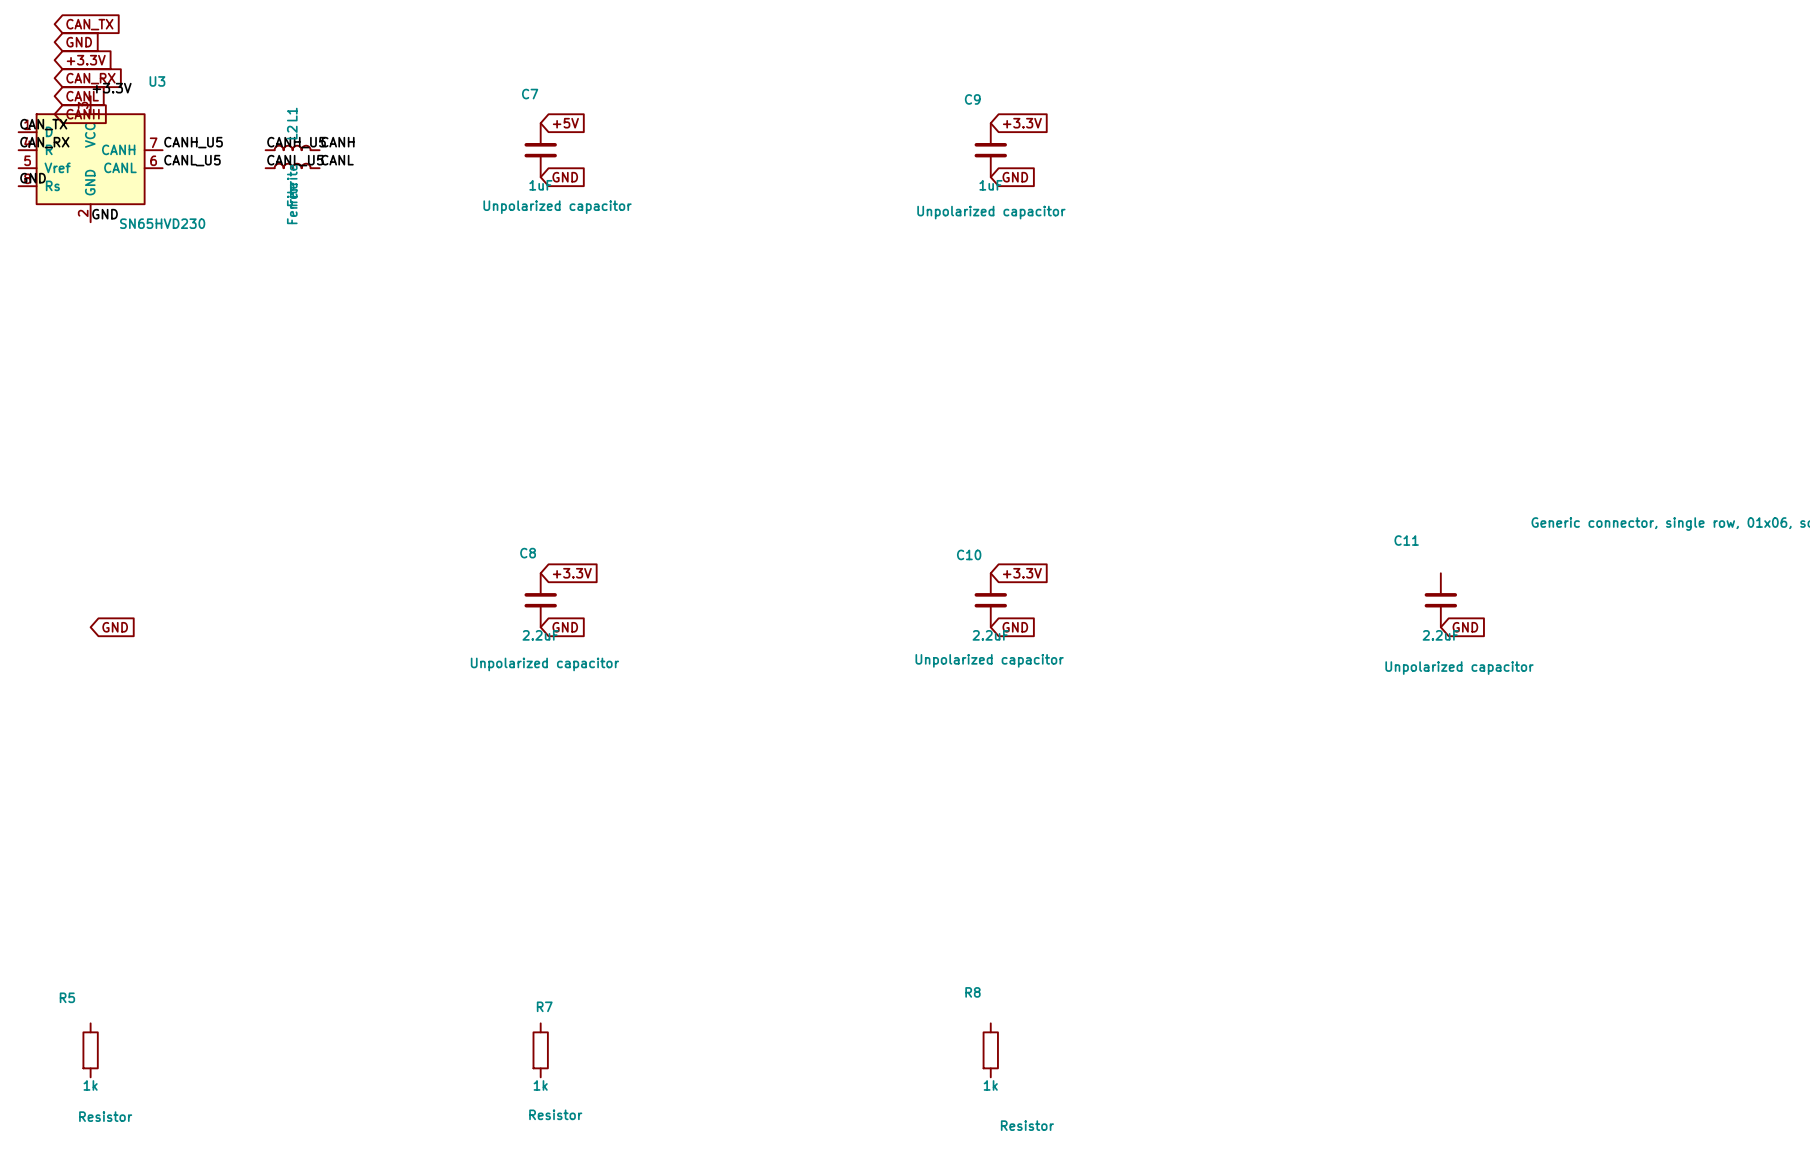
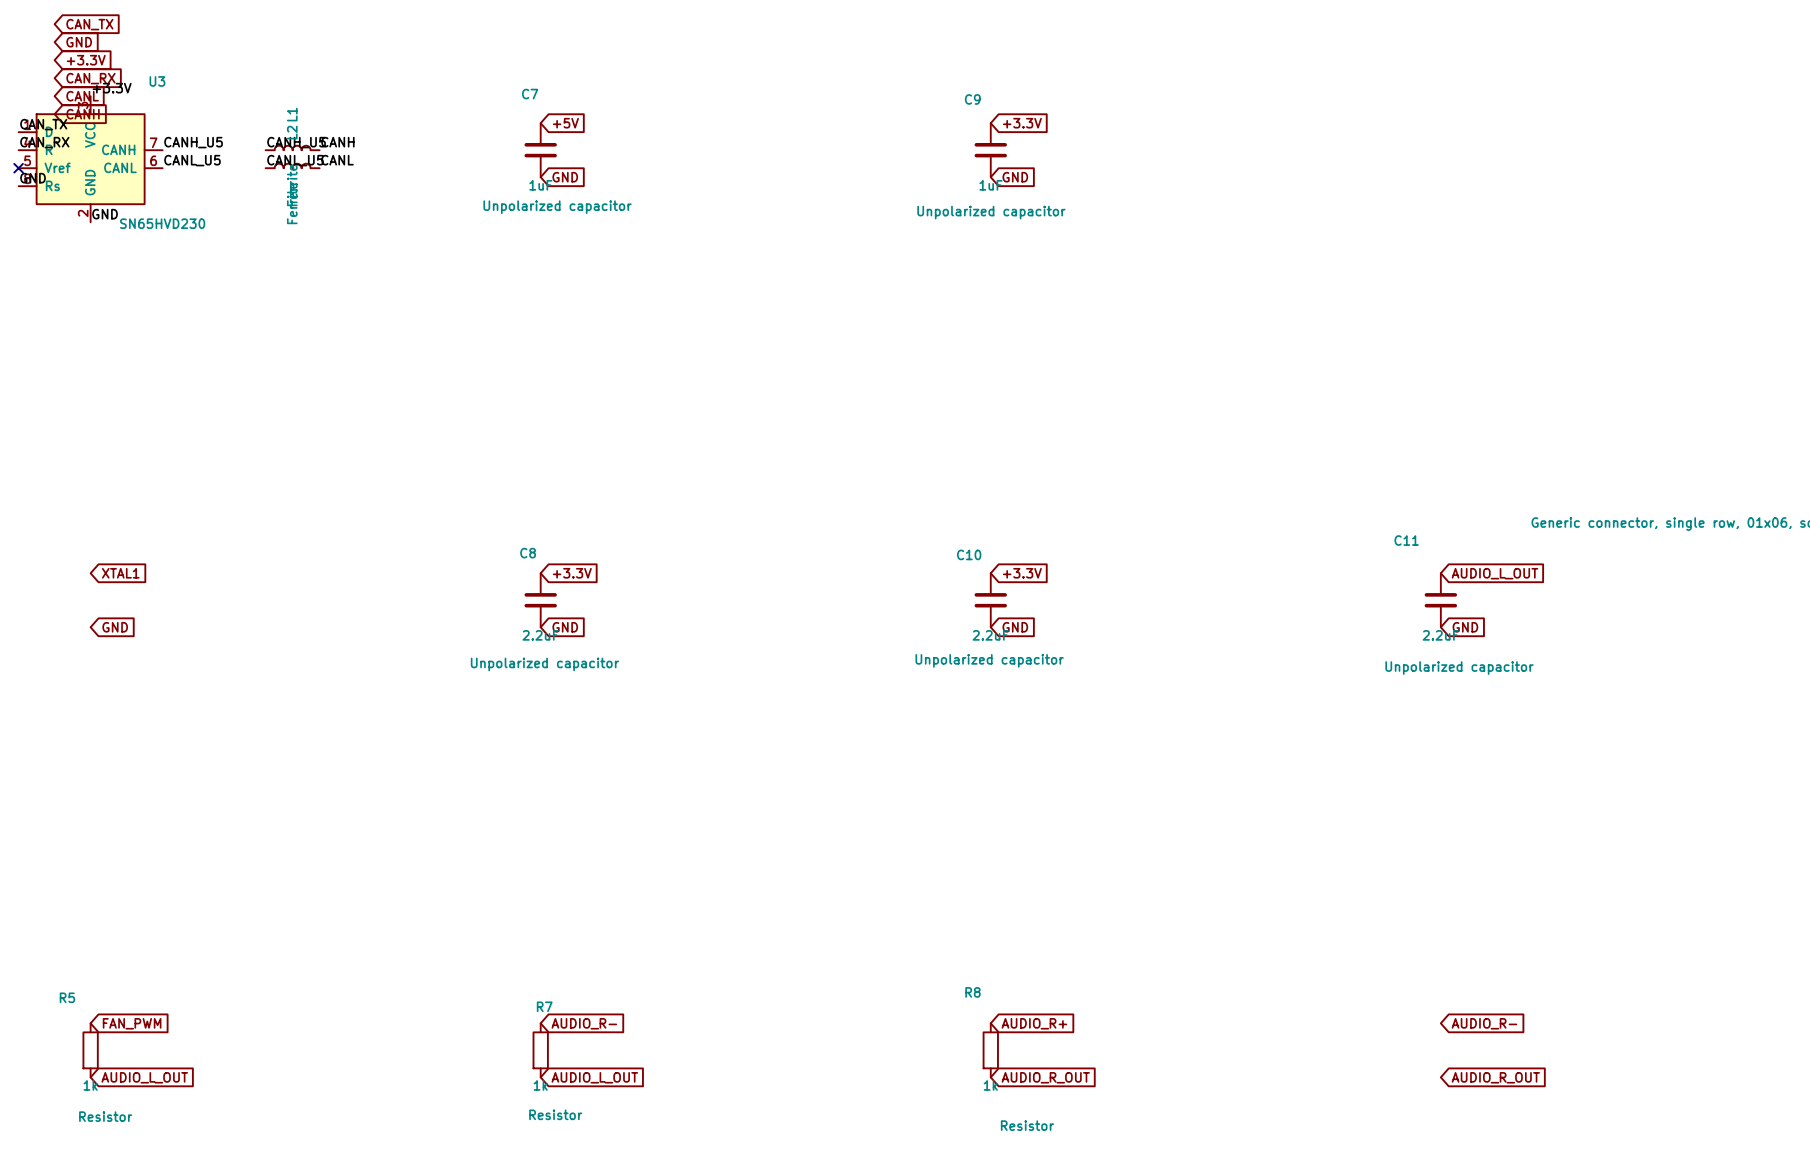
no-connect mark: none -> (18, 168)
global label: none -> XTAL1 (120, 573)
global label: none -> AUDIO_L_OUT (1494, 573)
global label: none -> FAN_PWM (132, 1023)
global label: none -> AUDIO_R- (584, 1023)
global label: none -> AUDIO_R+ (1034, 1023)
global label: none -> AUDIO_R- (1484, 1023)
global label: none -> AUDIO_L_OUT (144, 1077)
global label: none -> AUDIO_L_OUT (594, 1077)
global label: none -> AUDIO_R_OUT (1045, 1077)
global label: none -> AUDIO_R_OUT (1495, 1077)

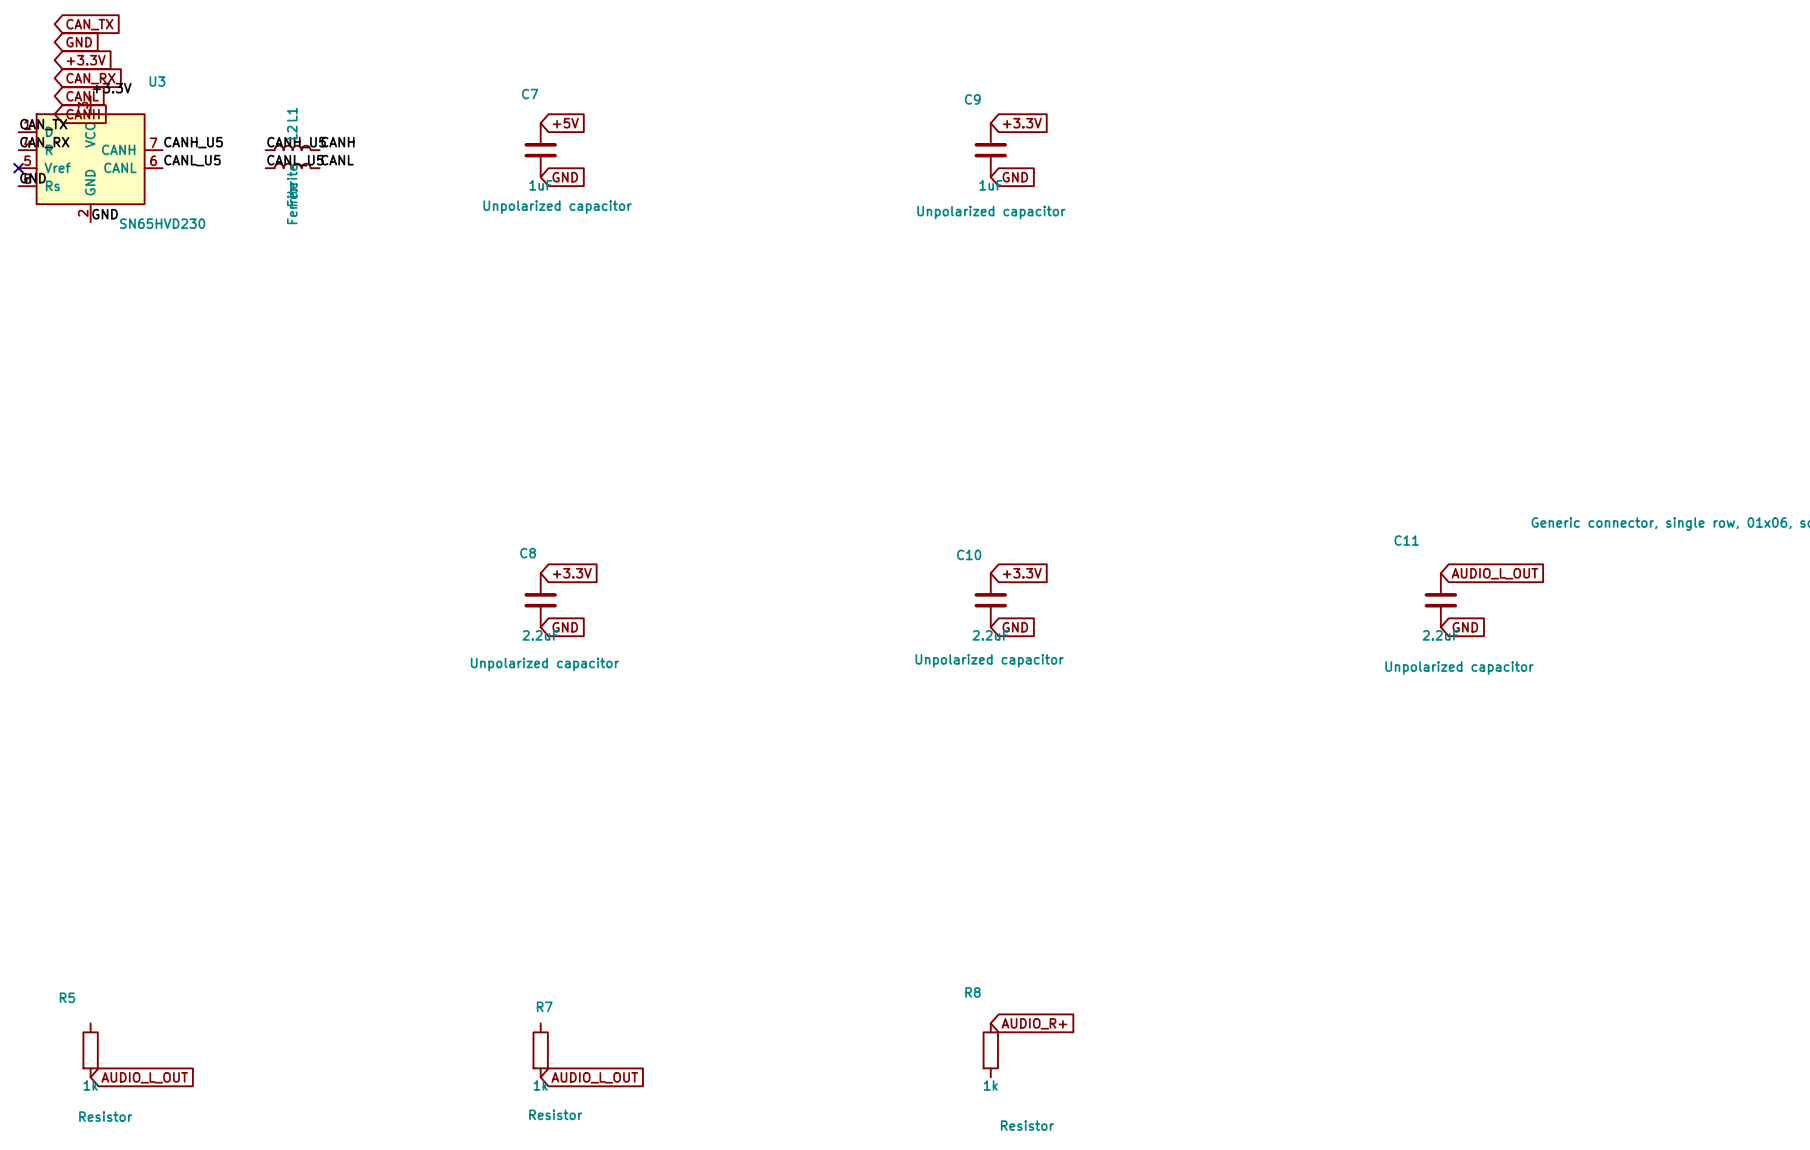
global label: XTAL1 (120, 573) -> none
global label: GND (115, 627) -> none
global label: FAN_PWM (132, 1023) -> none
global label: AUDIO_R- (584, 1023) -> none
global label: AUDIO_R- (1484, 1023) -> none
global label: AUDIO_R_OUT (1045, 1077) -> none
global label: AUDIO_R_OUT (1495, 1077) -> none

